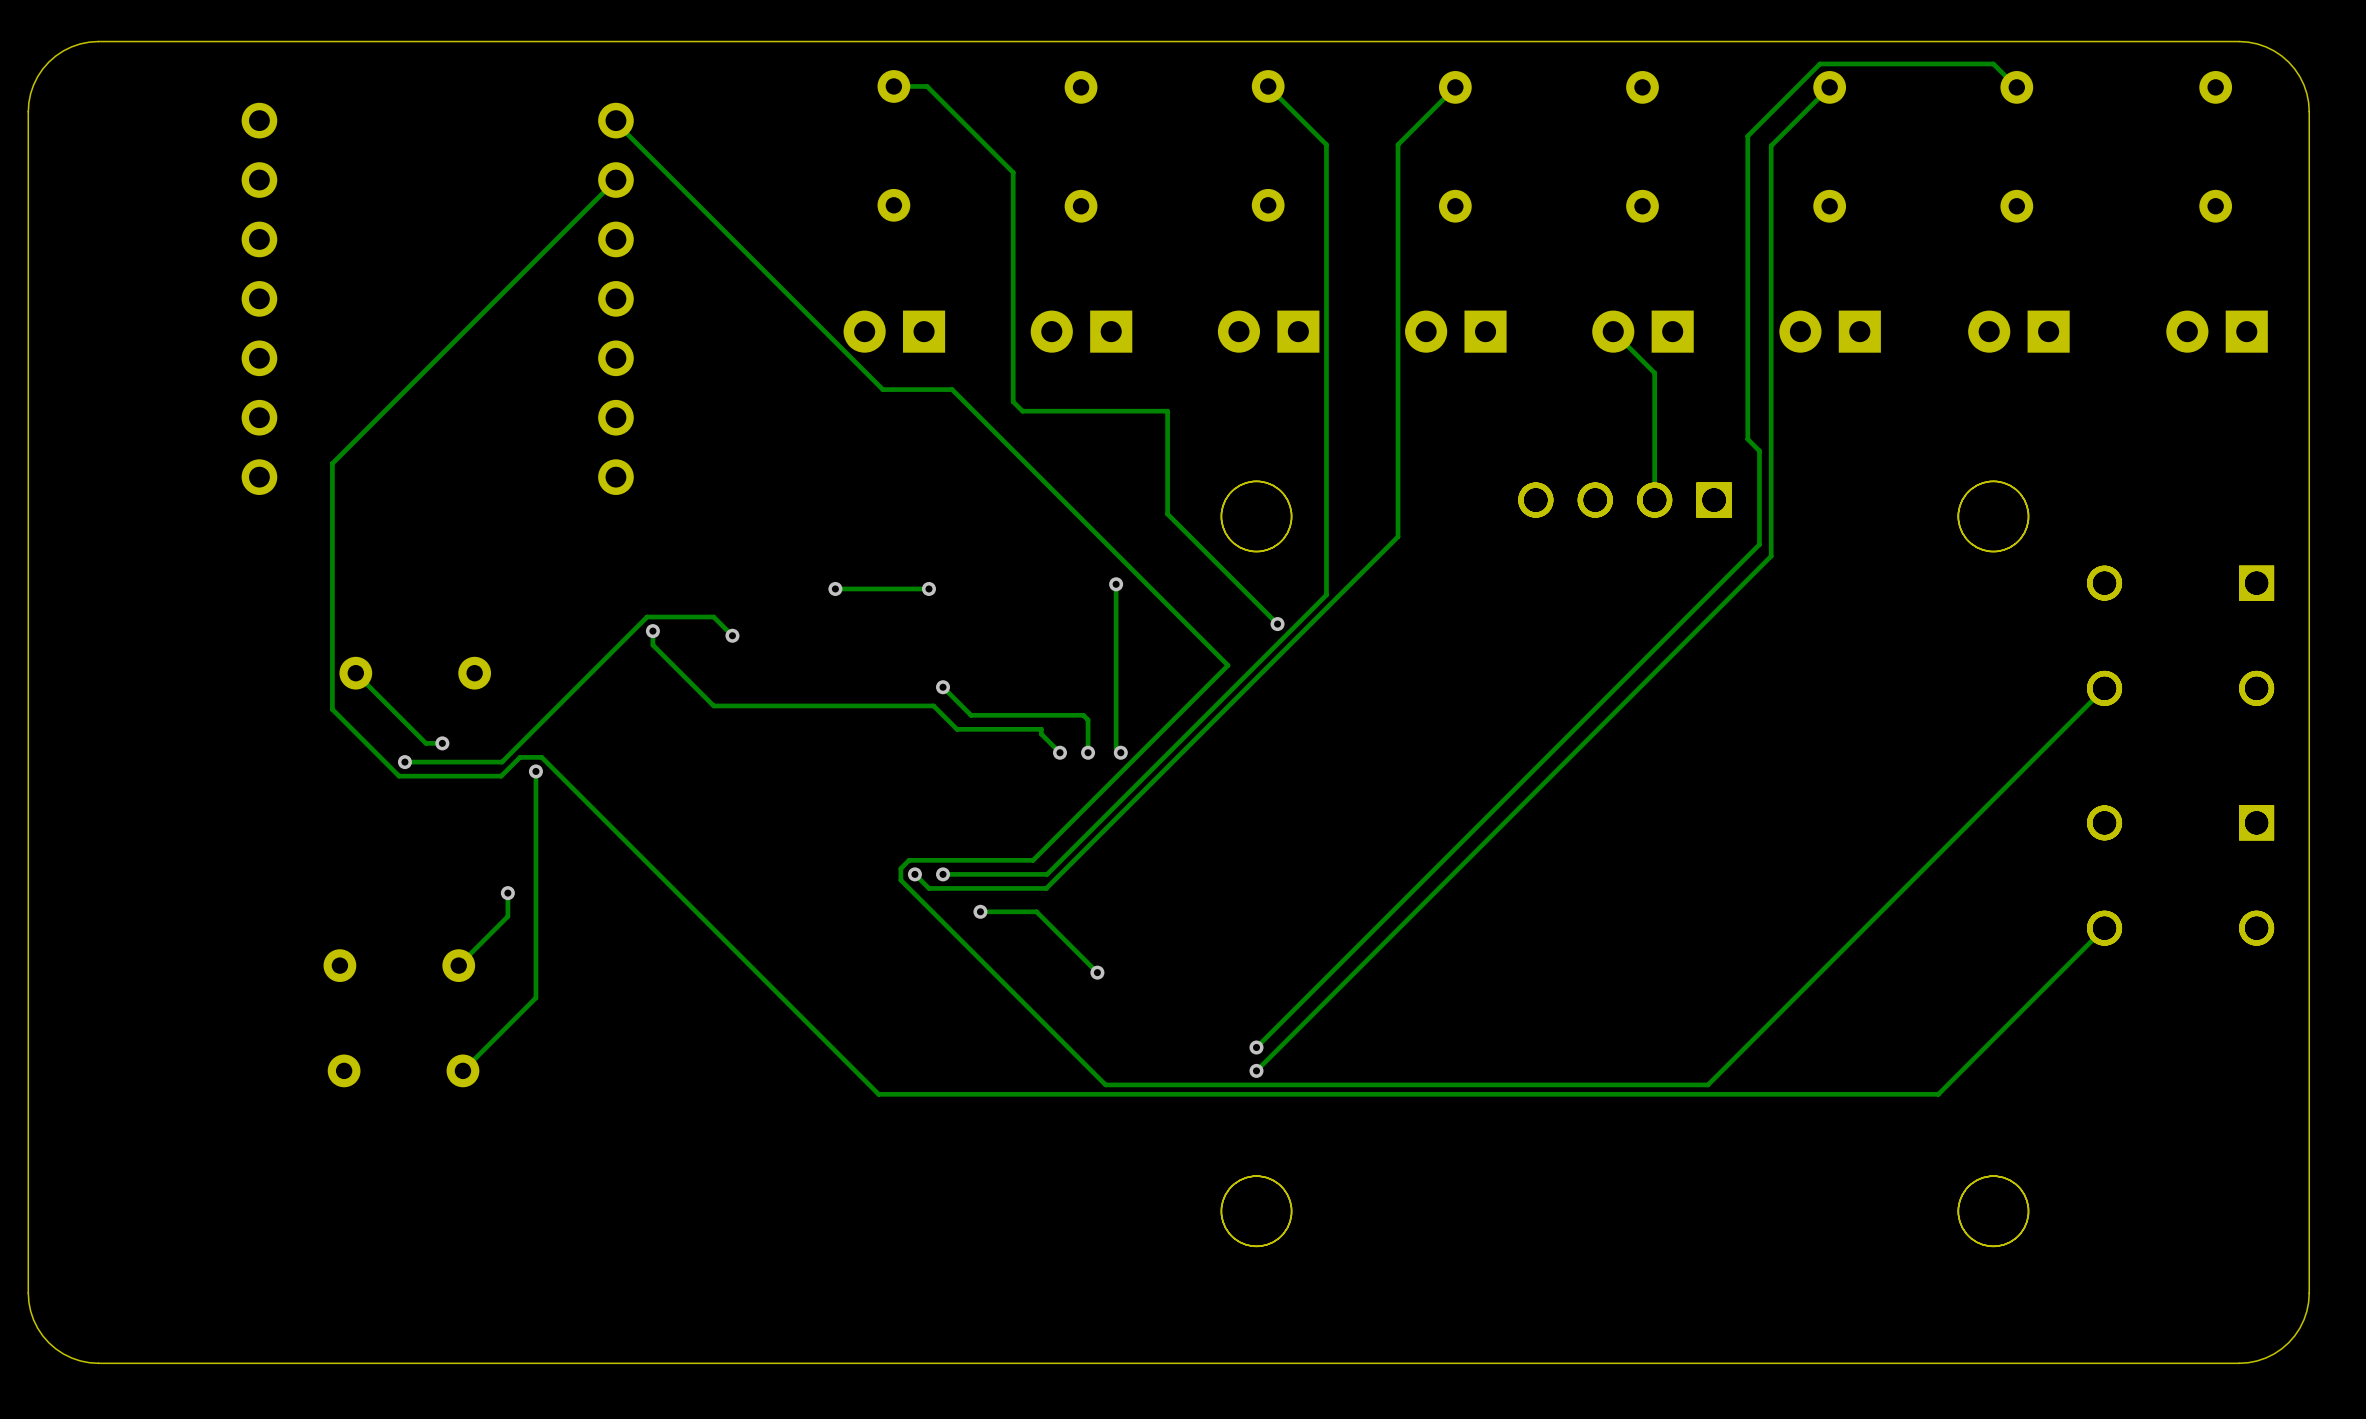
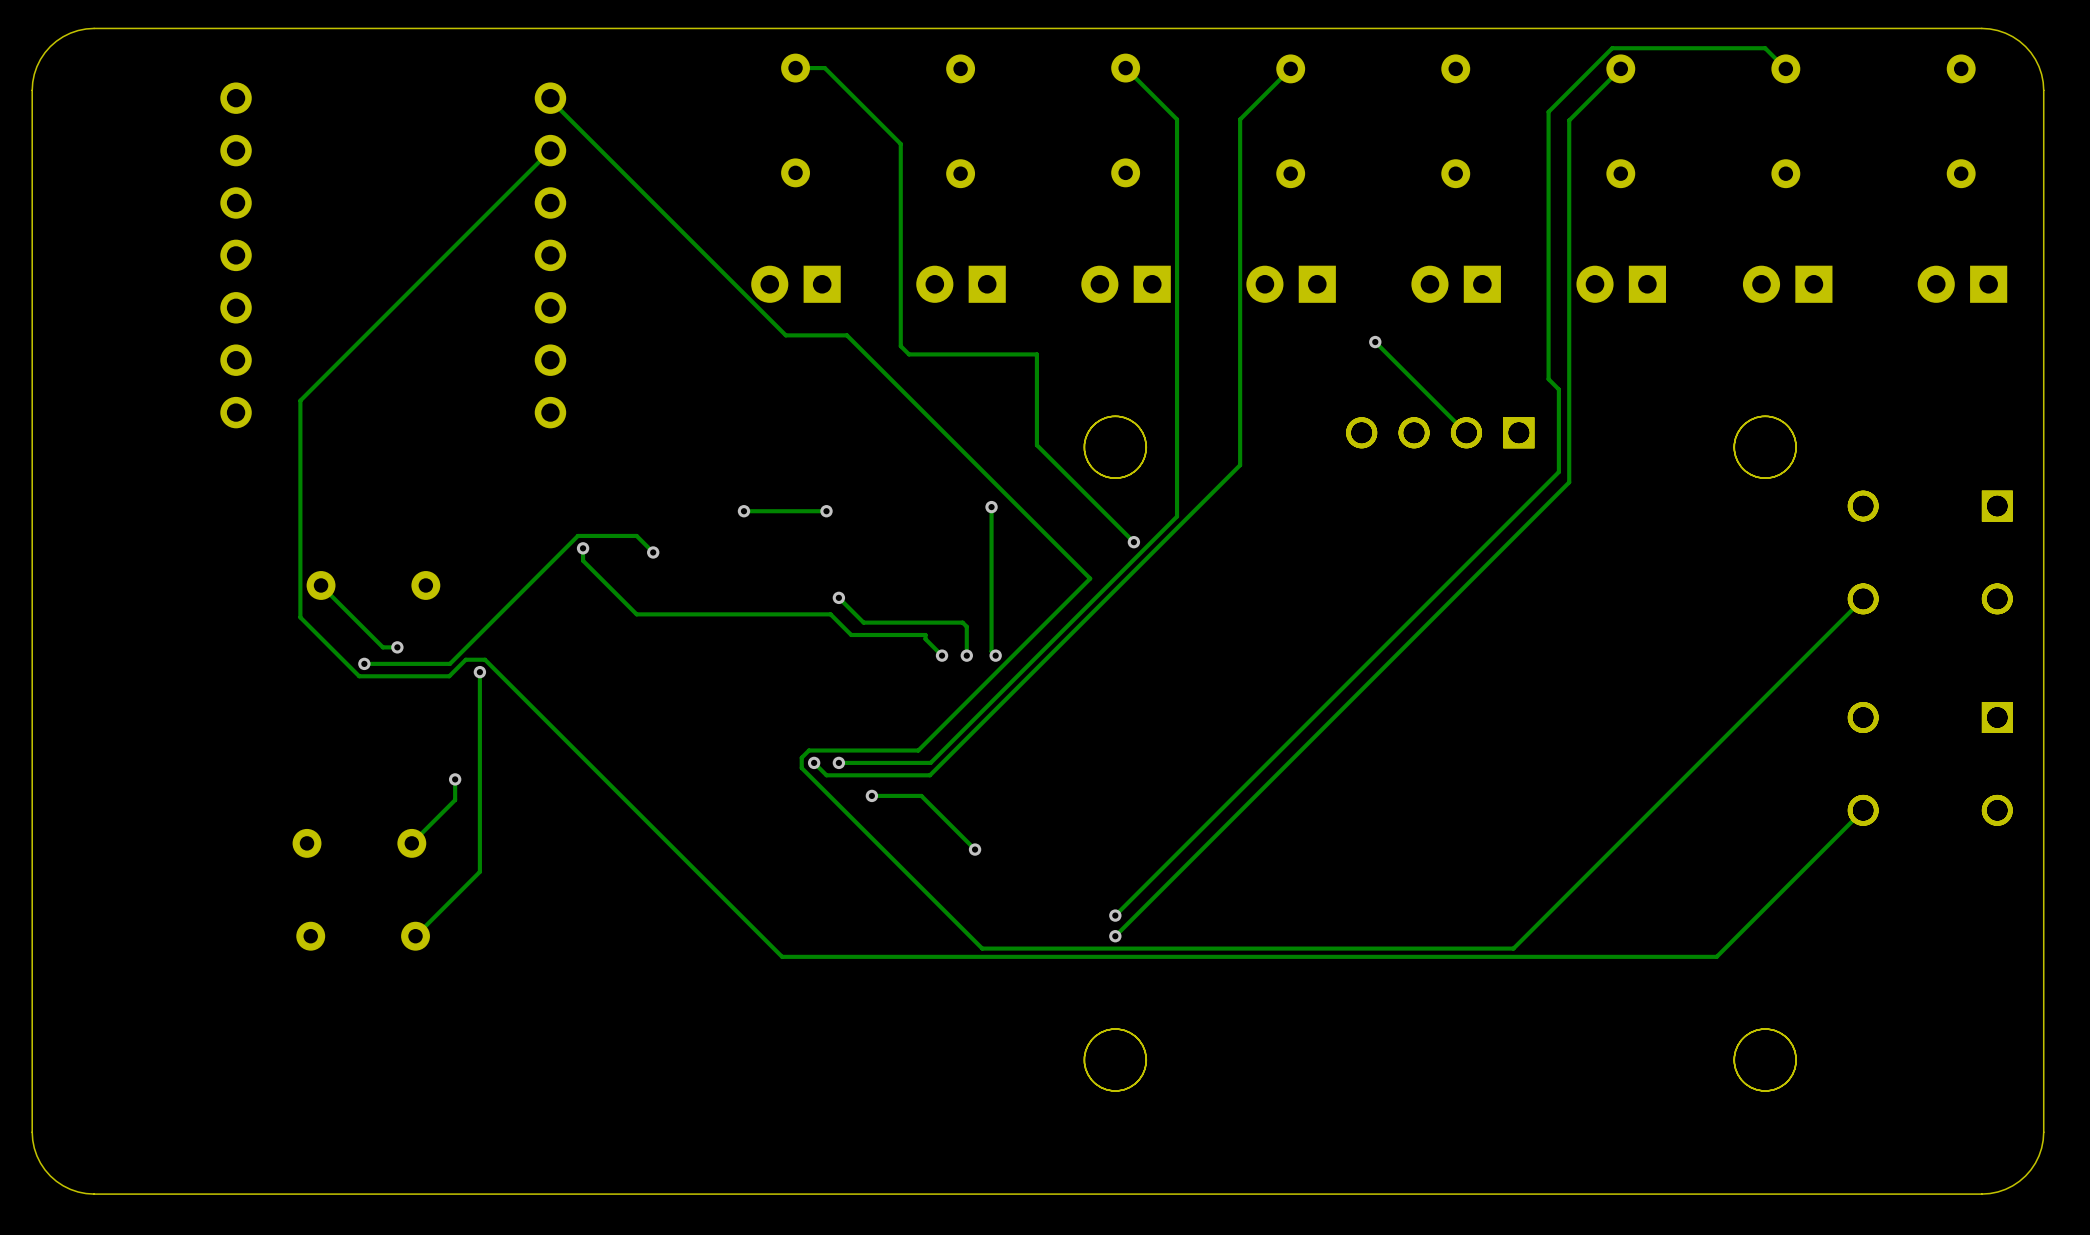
track: (1613, 331) (1654, 373) (1654, 500) -> (1375, 342) (1466, 432)
via: none -> (1375, 342)

